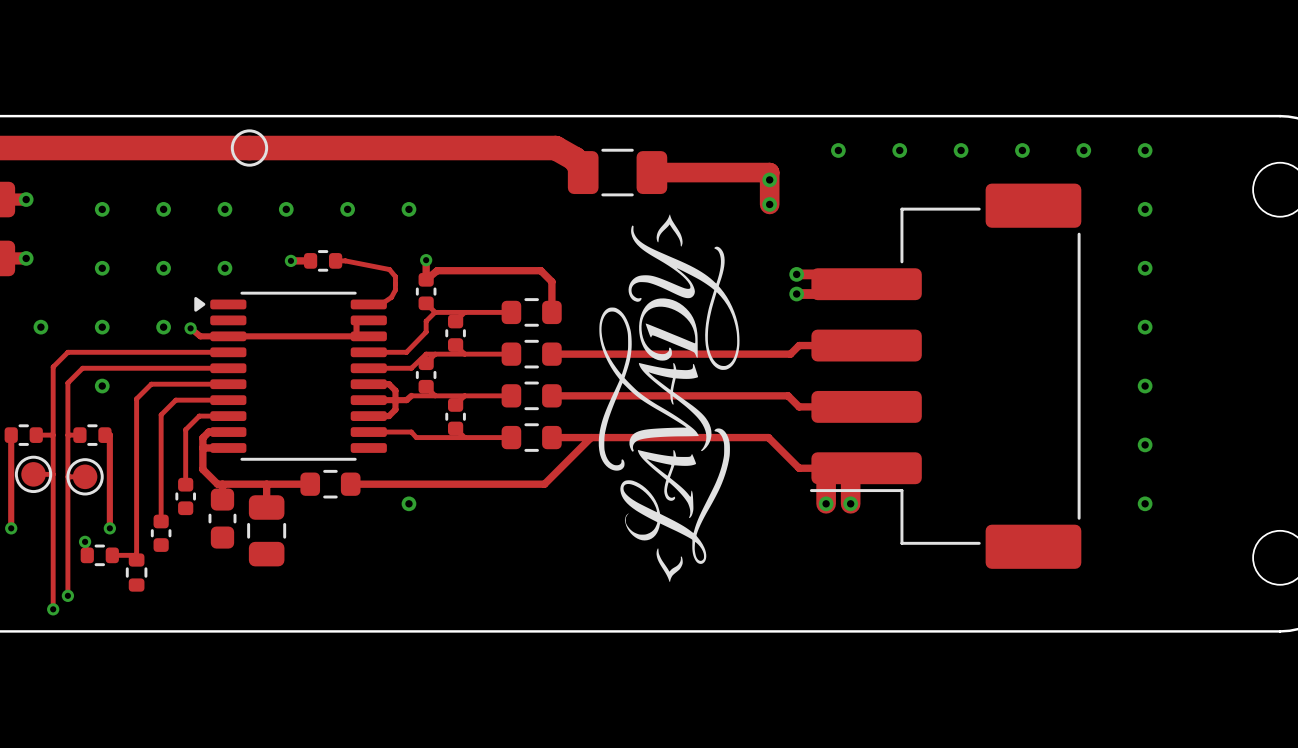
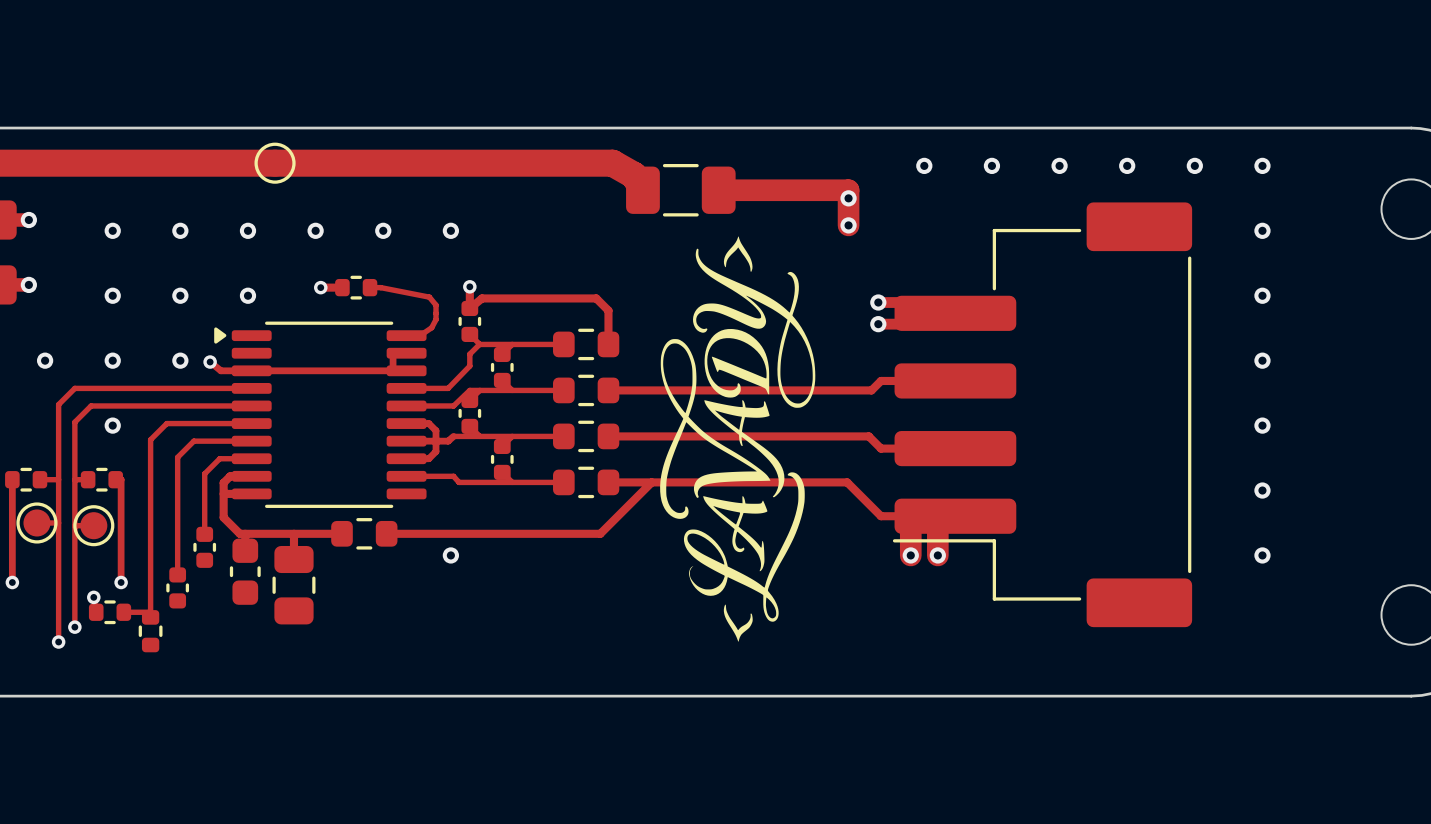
track: (67, 568) (67, 595) -> none
via: none -> (74, 627)
track: (53, 582) (53, 609) -> none
via: none -> (58, 642)
via: (67, 595) -> none
via: (53, 609) -> none

